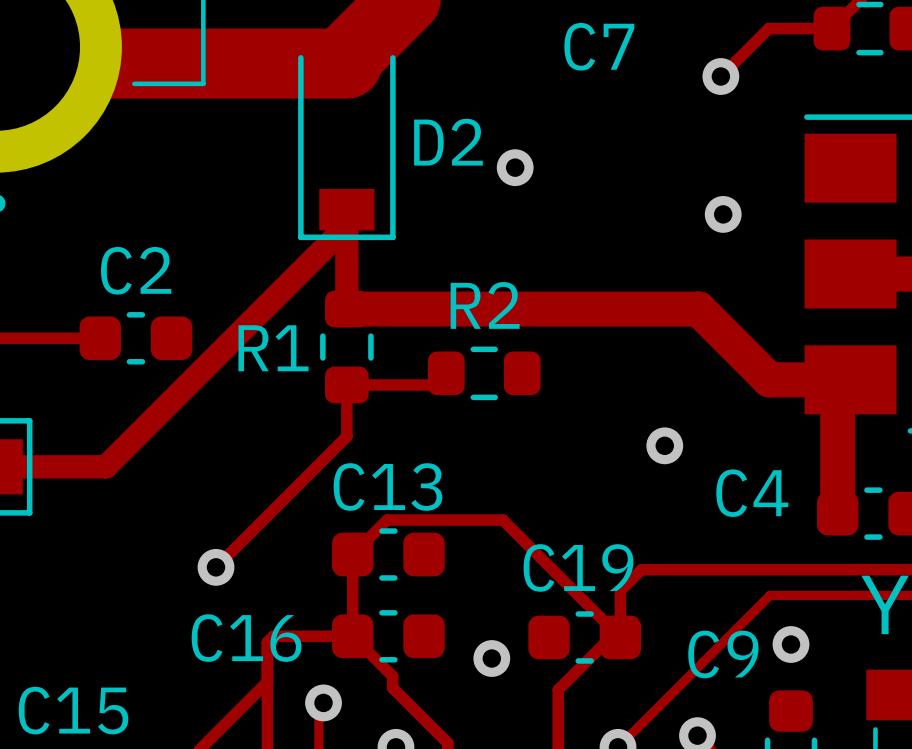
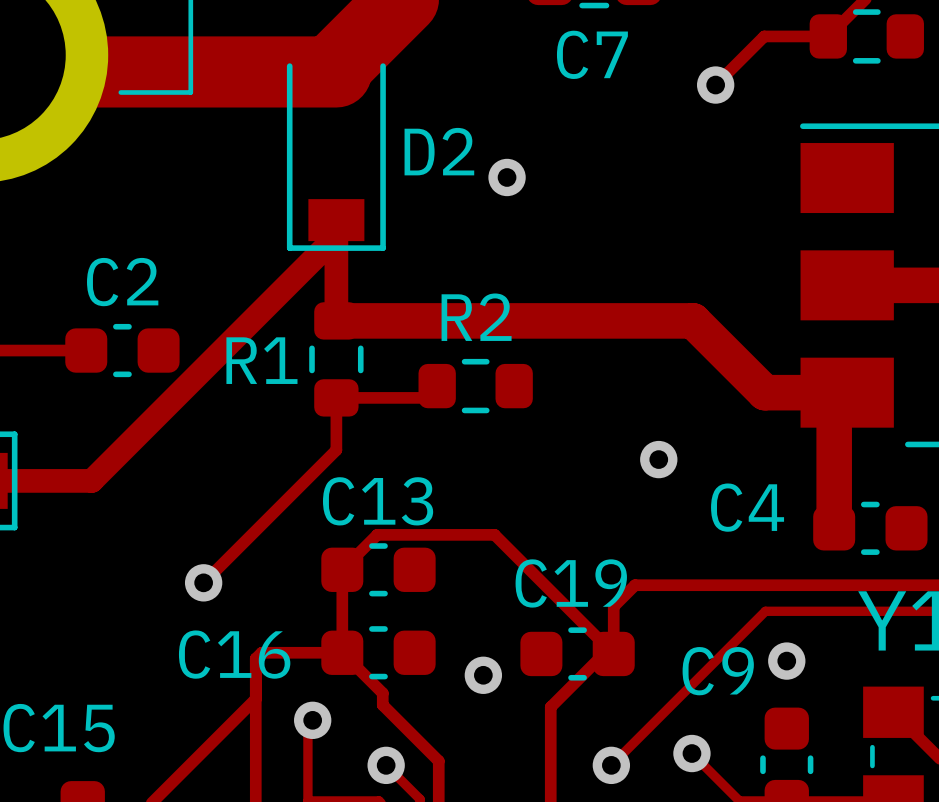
via: (723, 214) -> none

